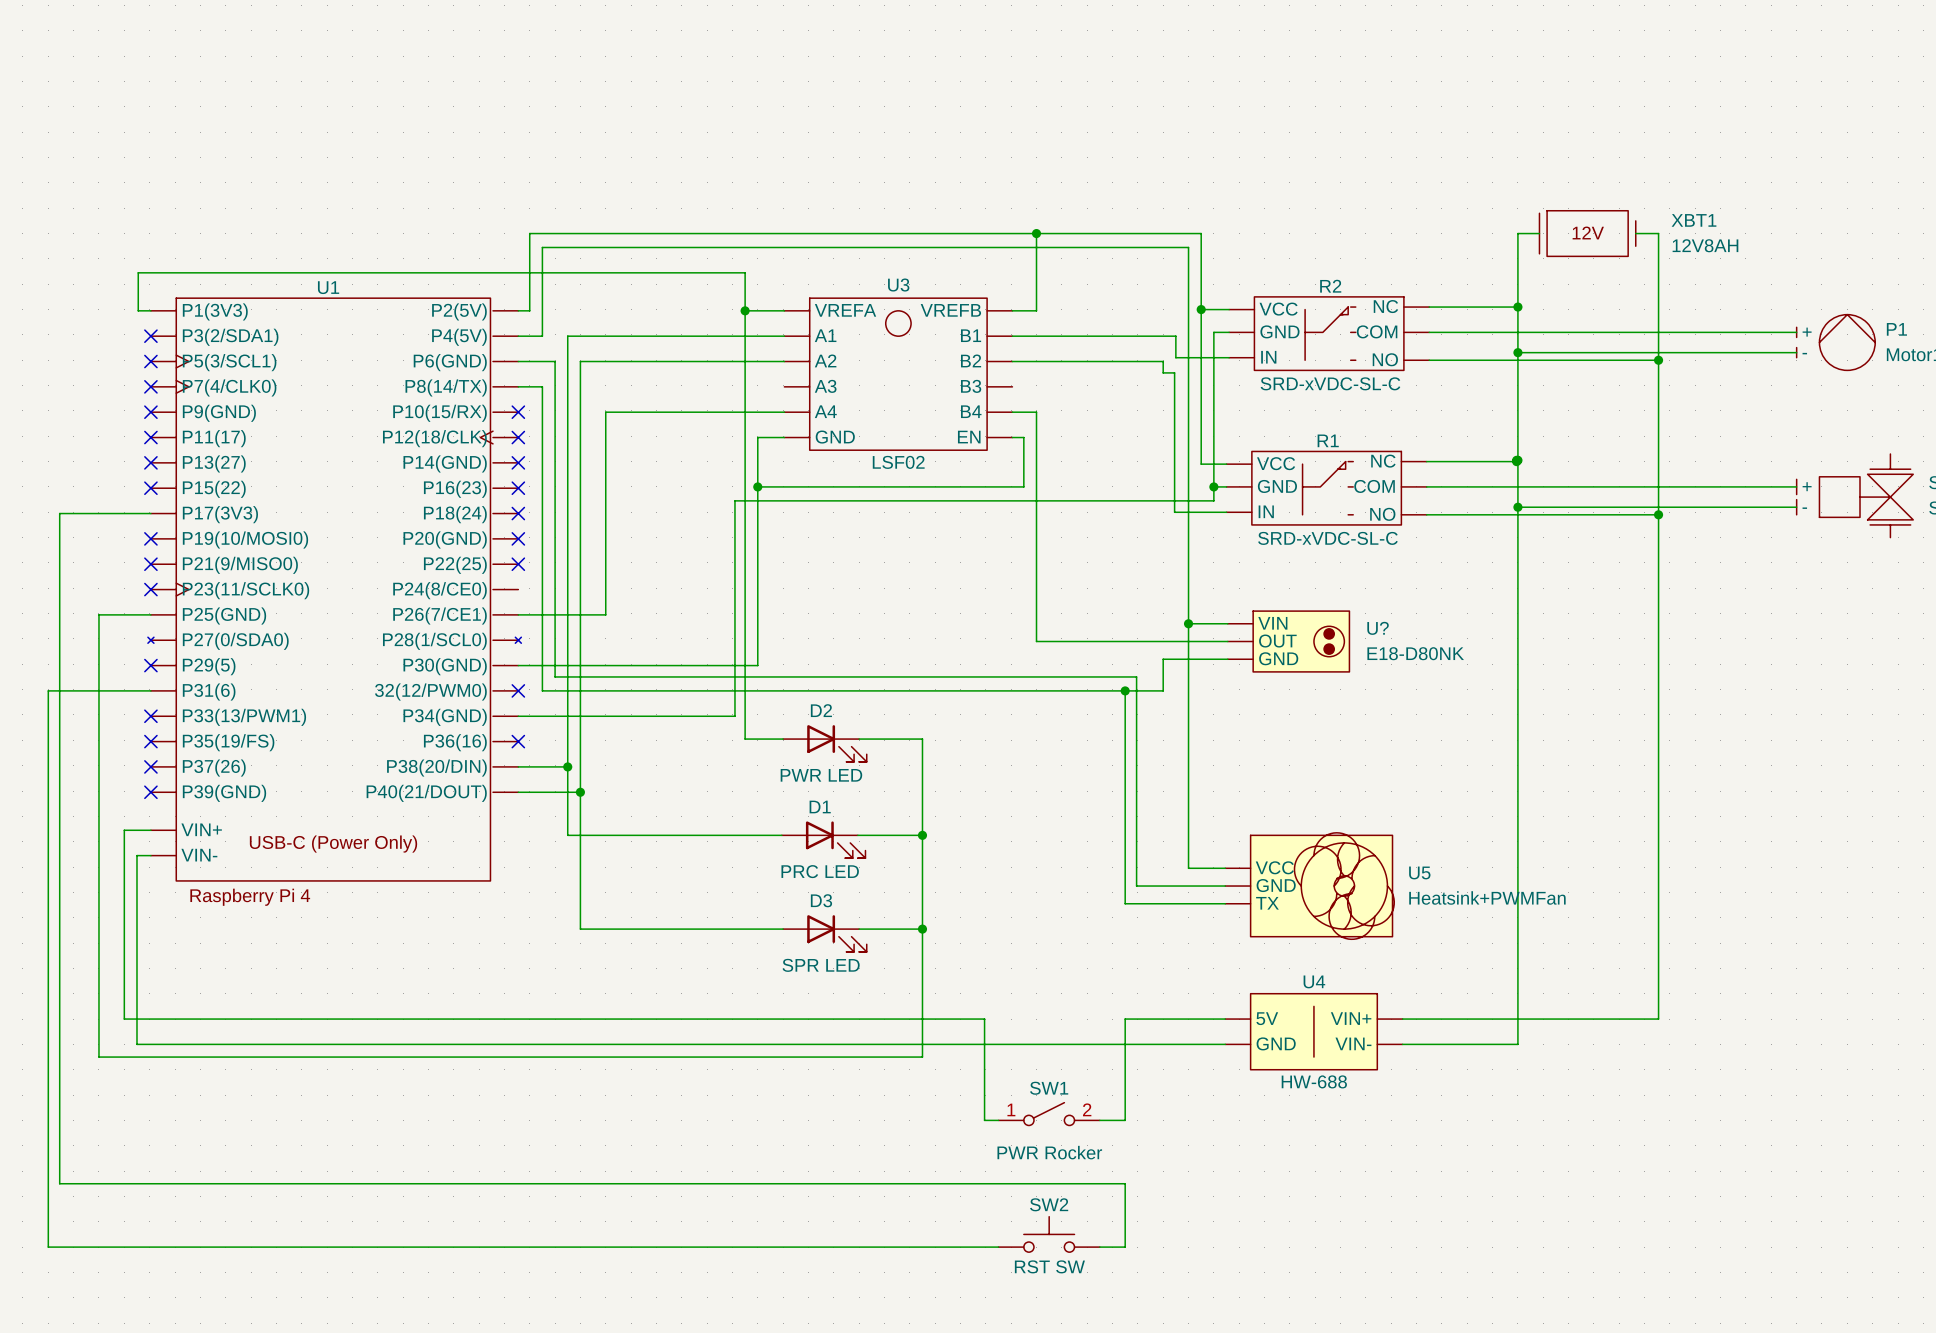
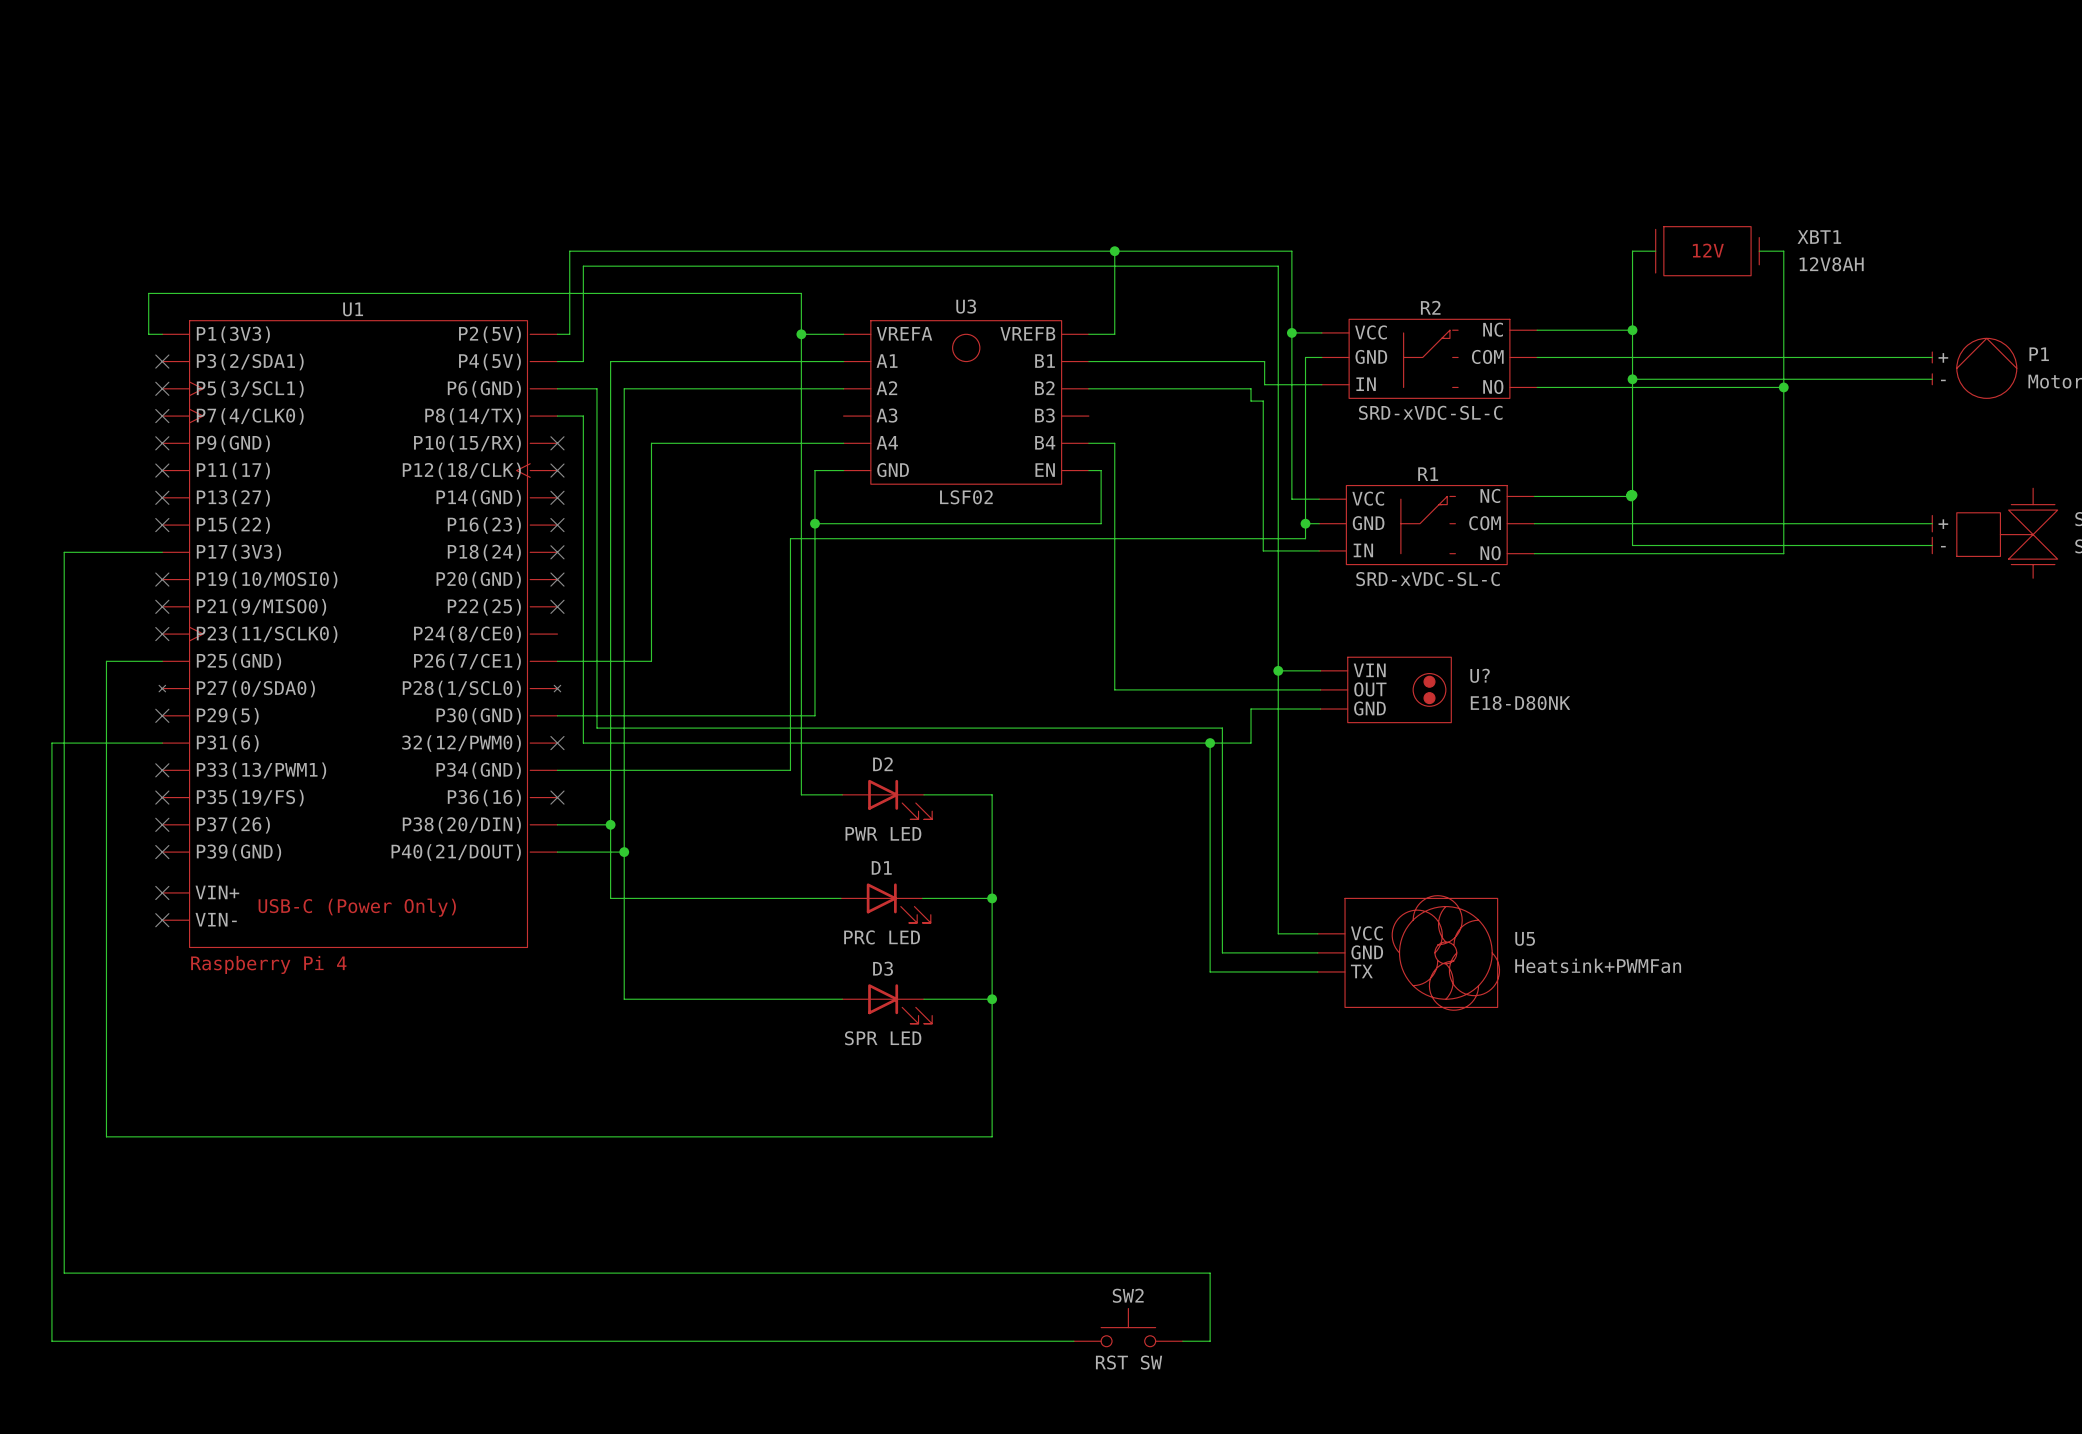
wire: (1517, 507) (1517, 1044) (1402, 1044) -> none
junction: (1517, 507) -> none
wire: (1658, 514) (1658, 1019) (1402, 1019) -> none
junction: (1658, 514) -> none
wire: (150, 830) (124, 830) (124, 1019) (984, 1019) (984, 1120) (998, 1120) -> none
no-connect mark: none -> (162, 892)
wire: (150, 855) (136, 855) (136, 1044) (1225, 1044) -> none
no-connect mark: none -> (162, 920)
wire: (1225, 1019) (1125, 1019) (1125, 1120) (1099, 1120) -> none
U4: HW-688 (1313, 1031) -> none
SW1: PWR Rocker (1049, 1114) -> none

